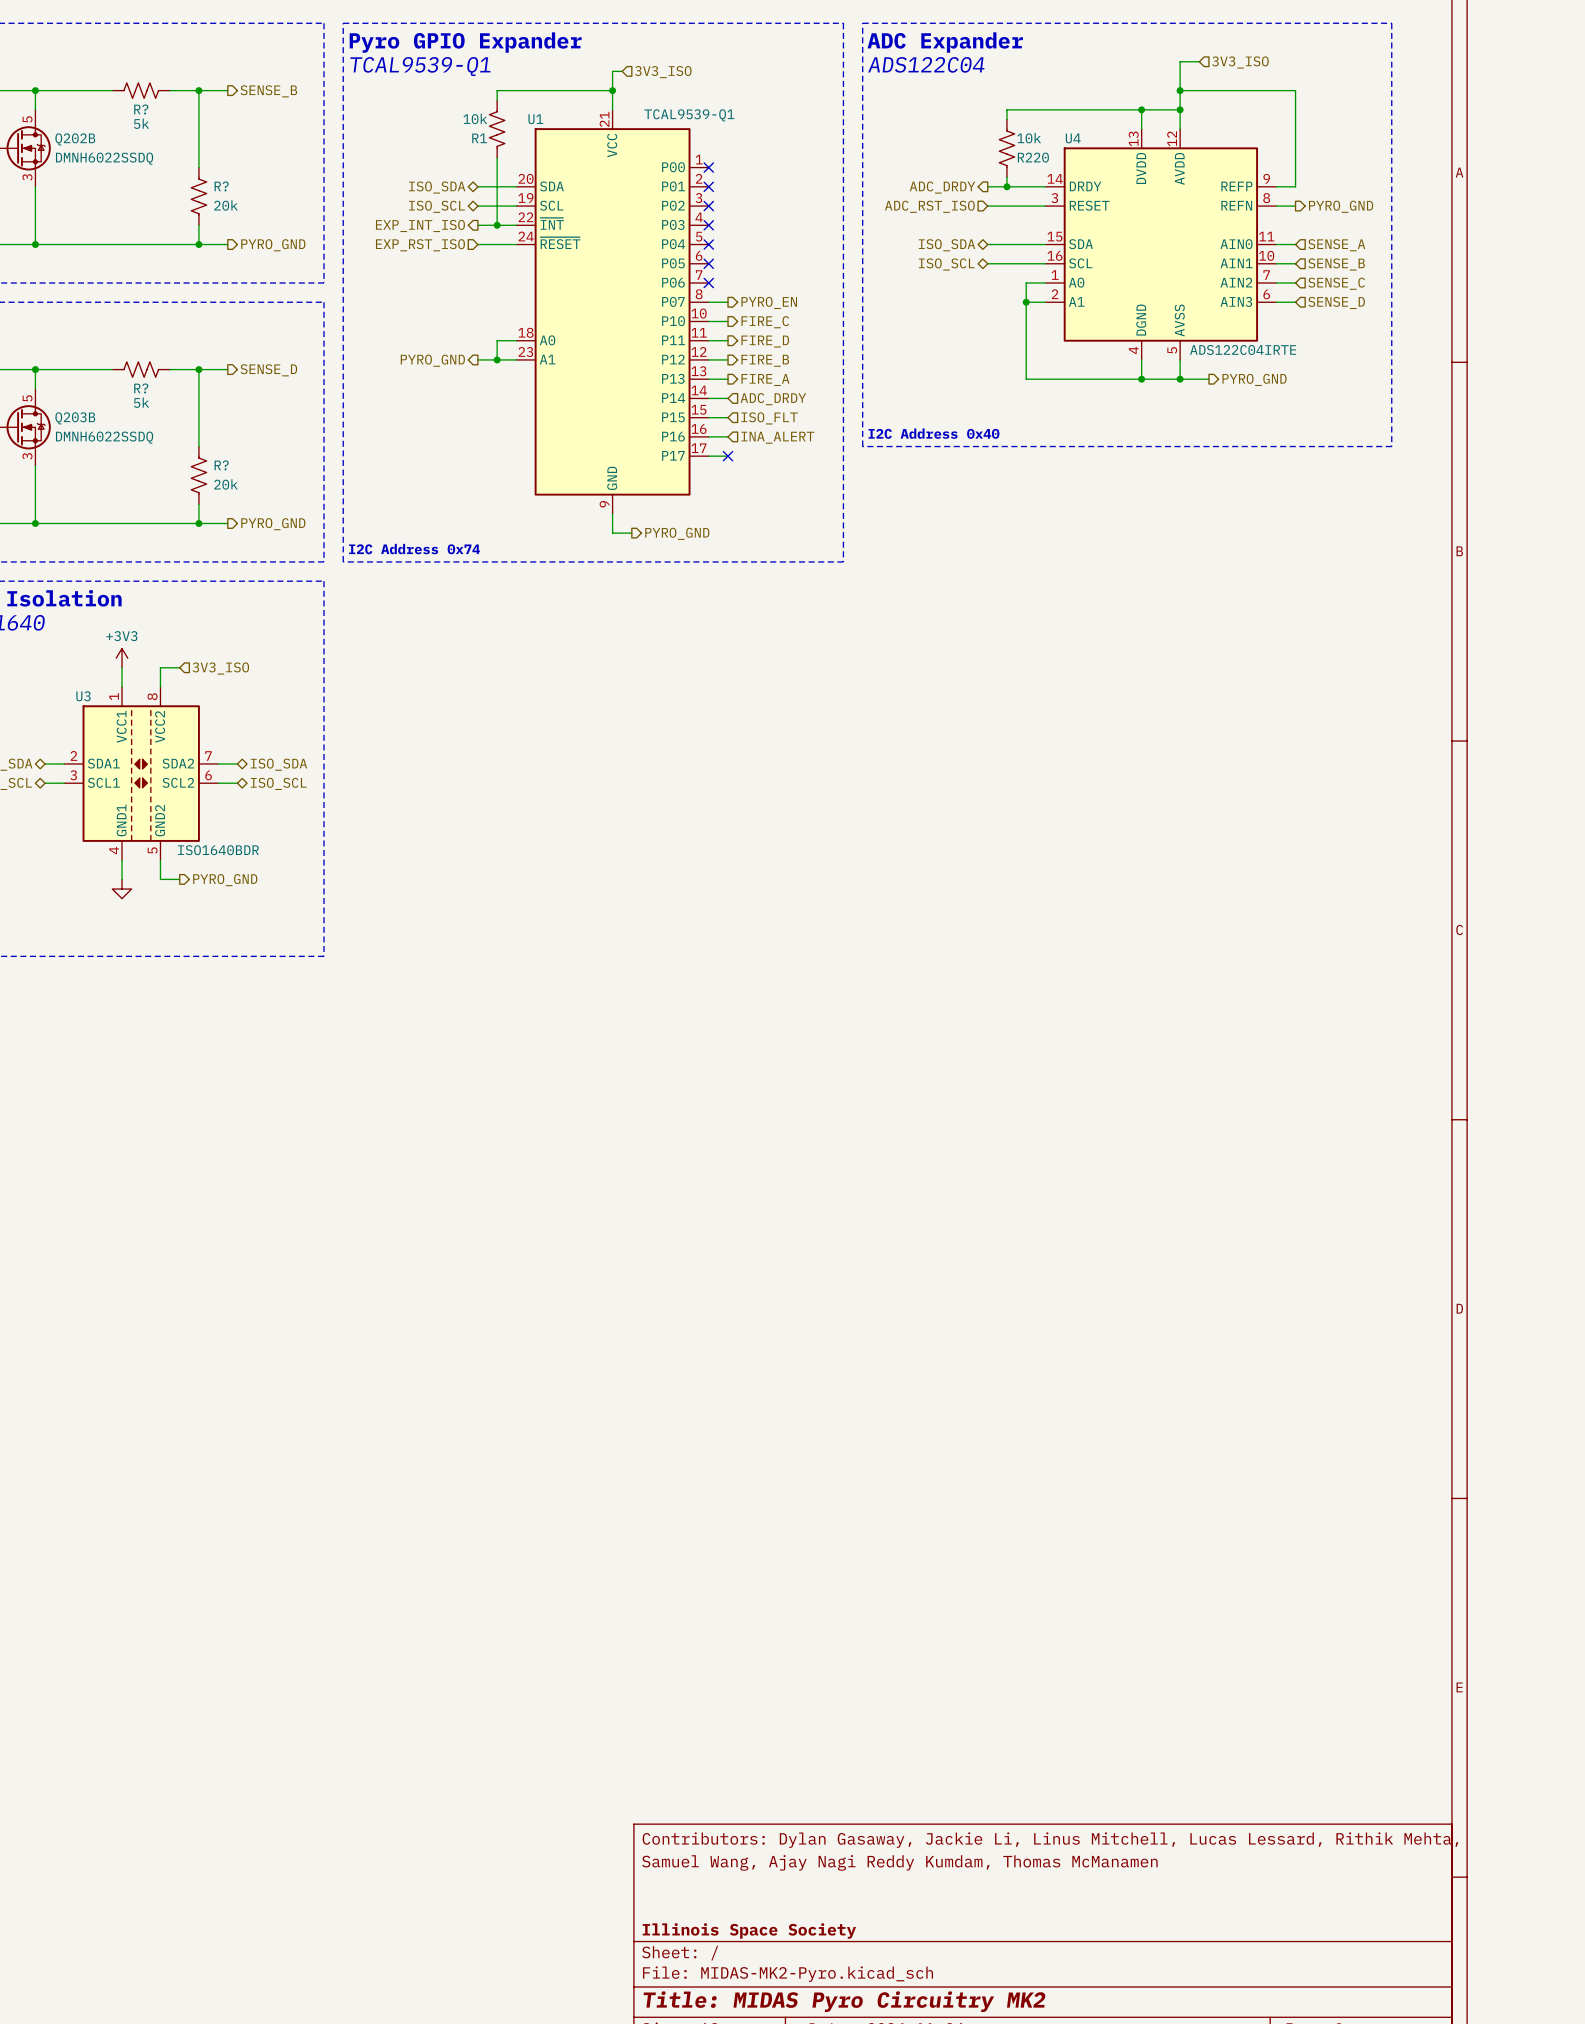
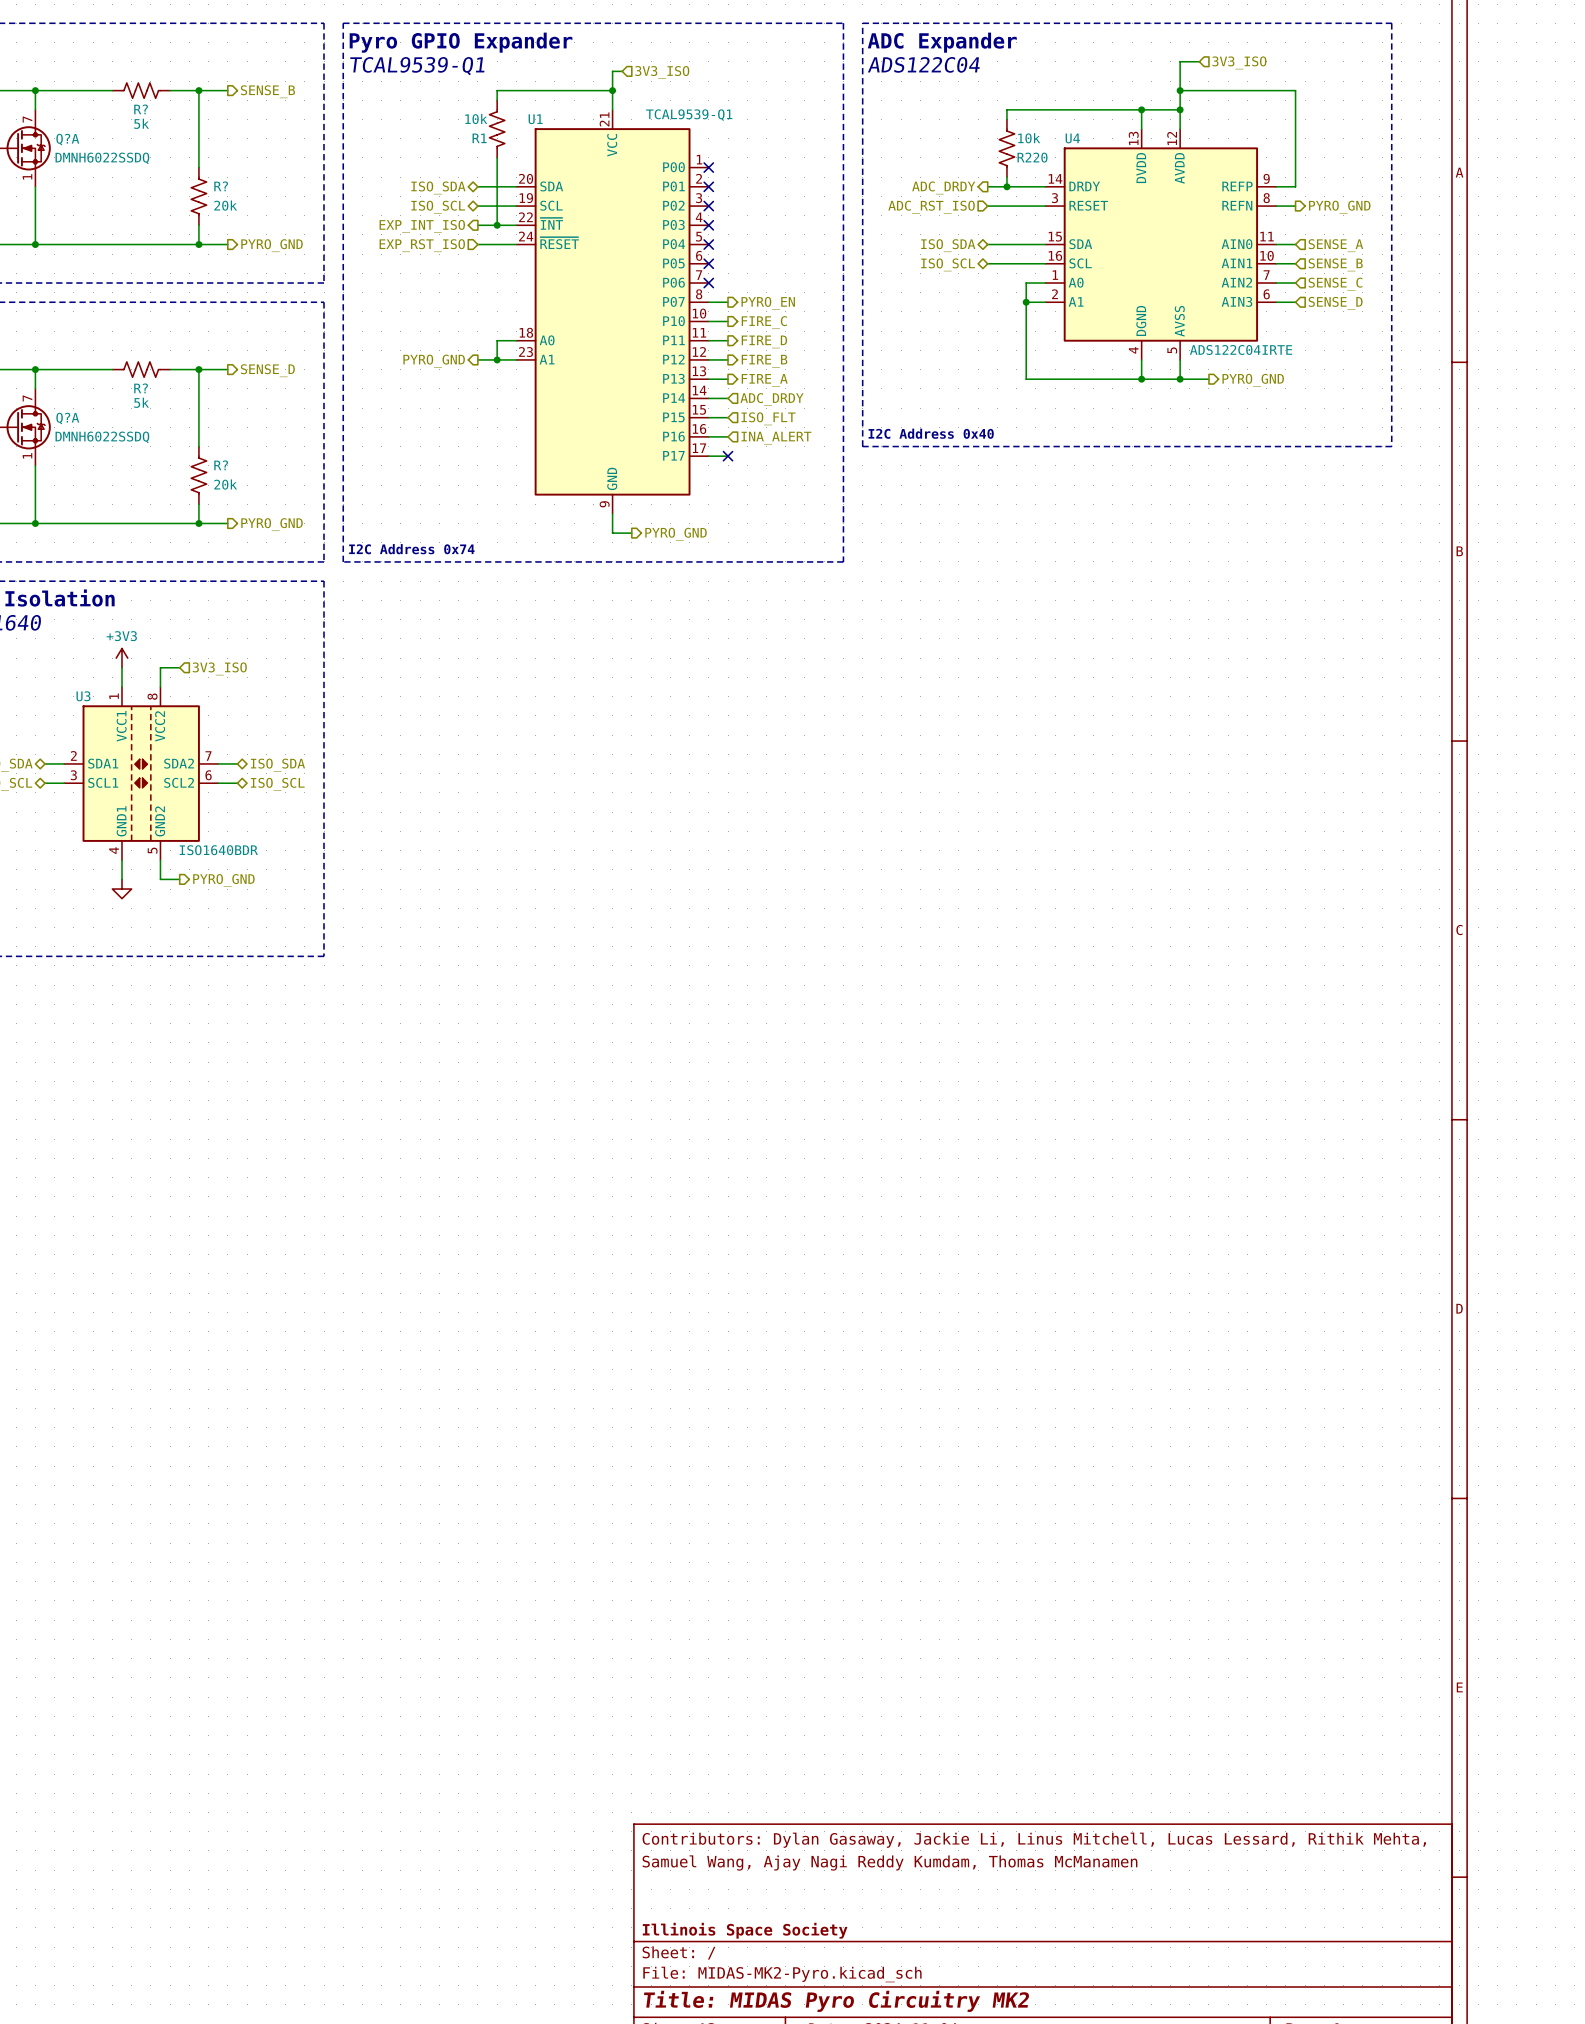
Q202B pin number: 5 (27, 119) -> 7 (27, 119)
Q202B name: Q202B (75, 139) -> Q?A (67, 139)
Q202B pin number: 3 (27, 177) -> 1 (27, 176)
Q203B pin number: 5 (27, 398) -> 7 (27, 398)
Q203B name: Q203B (75, 418) -> Q?A (67, 418)
Q203B pin number: 3 (27, 456) -> 1 (27, 455)

